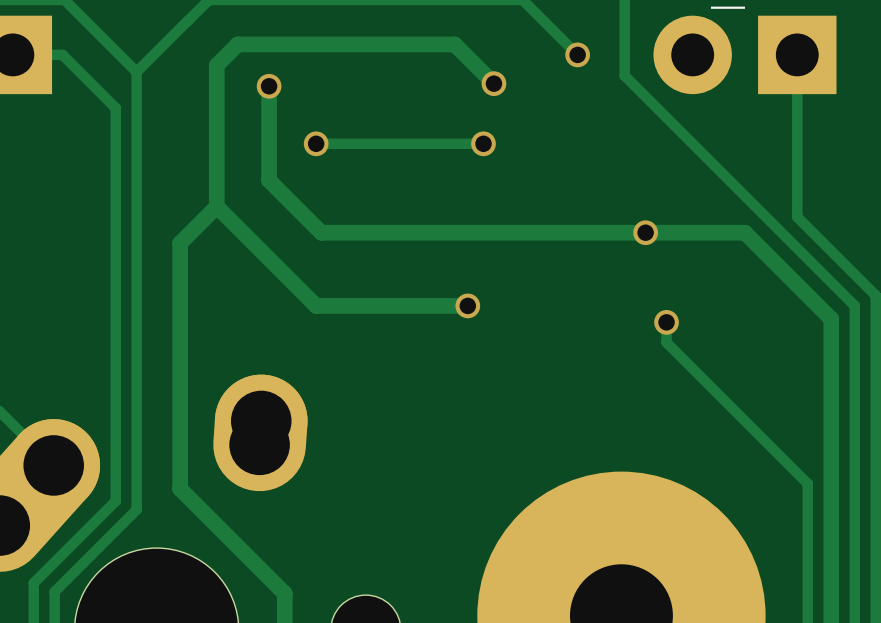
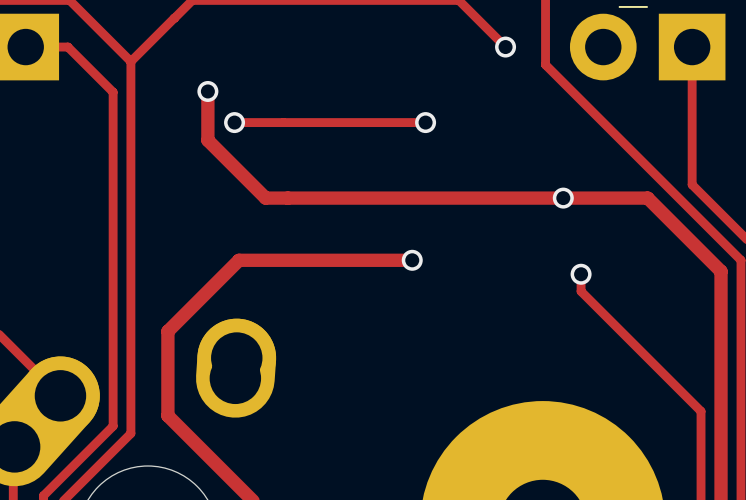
track: (493, 83) (454, 44) (237, 44) (216, 65) (216, 206) -> none
via: (493, 83) -> none
track: (269, 86) (269, 180) (321, 232) -> (207, 91) (207, 140) (265, 198) (287, 198)
via: (269, 86) -> none
via: none -> (207, 91)
track: none -> (234, 122) (283, 122)
via: none -> (234, 122)
via: (316, 143) -> none
track: (216, 206) (180, 243) (180, 389) -> (283, 260) (238, 260) (167, 331)
track: (216, 206) (316, 305) -> none

